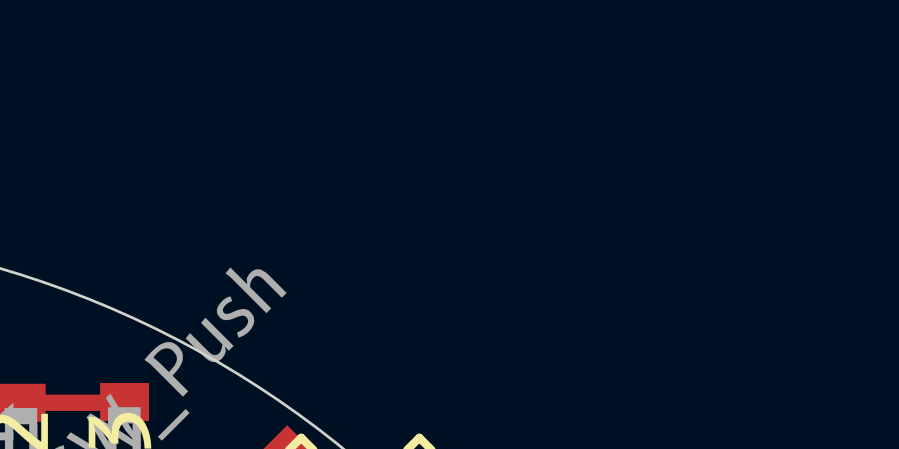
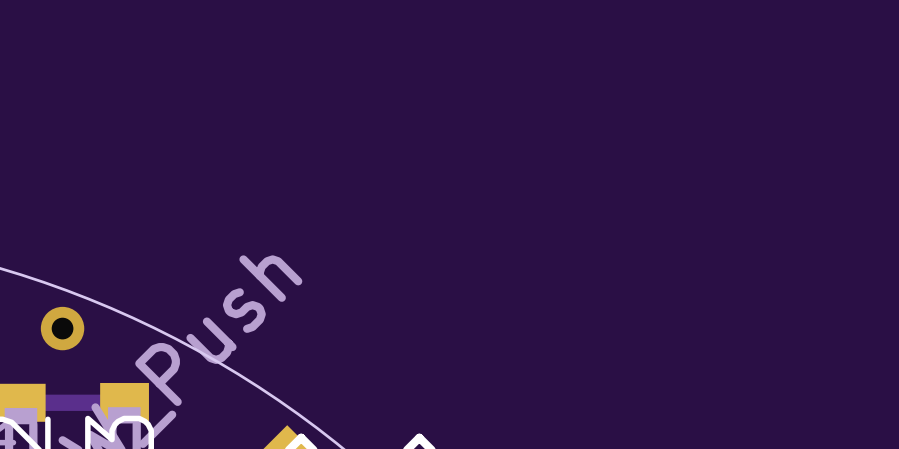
via: none -> (62, 328)

